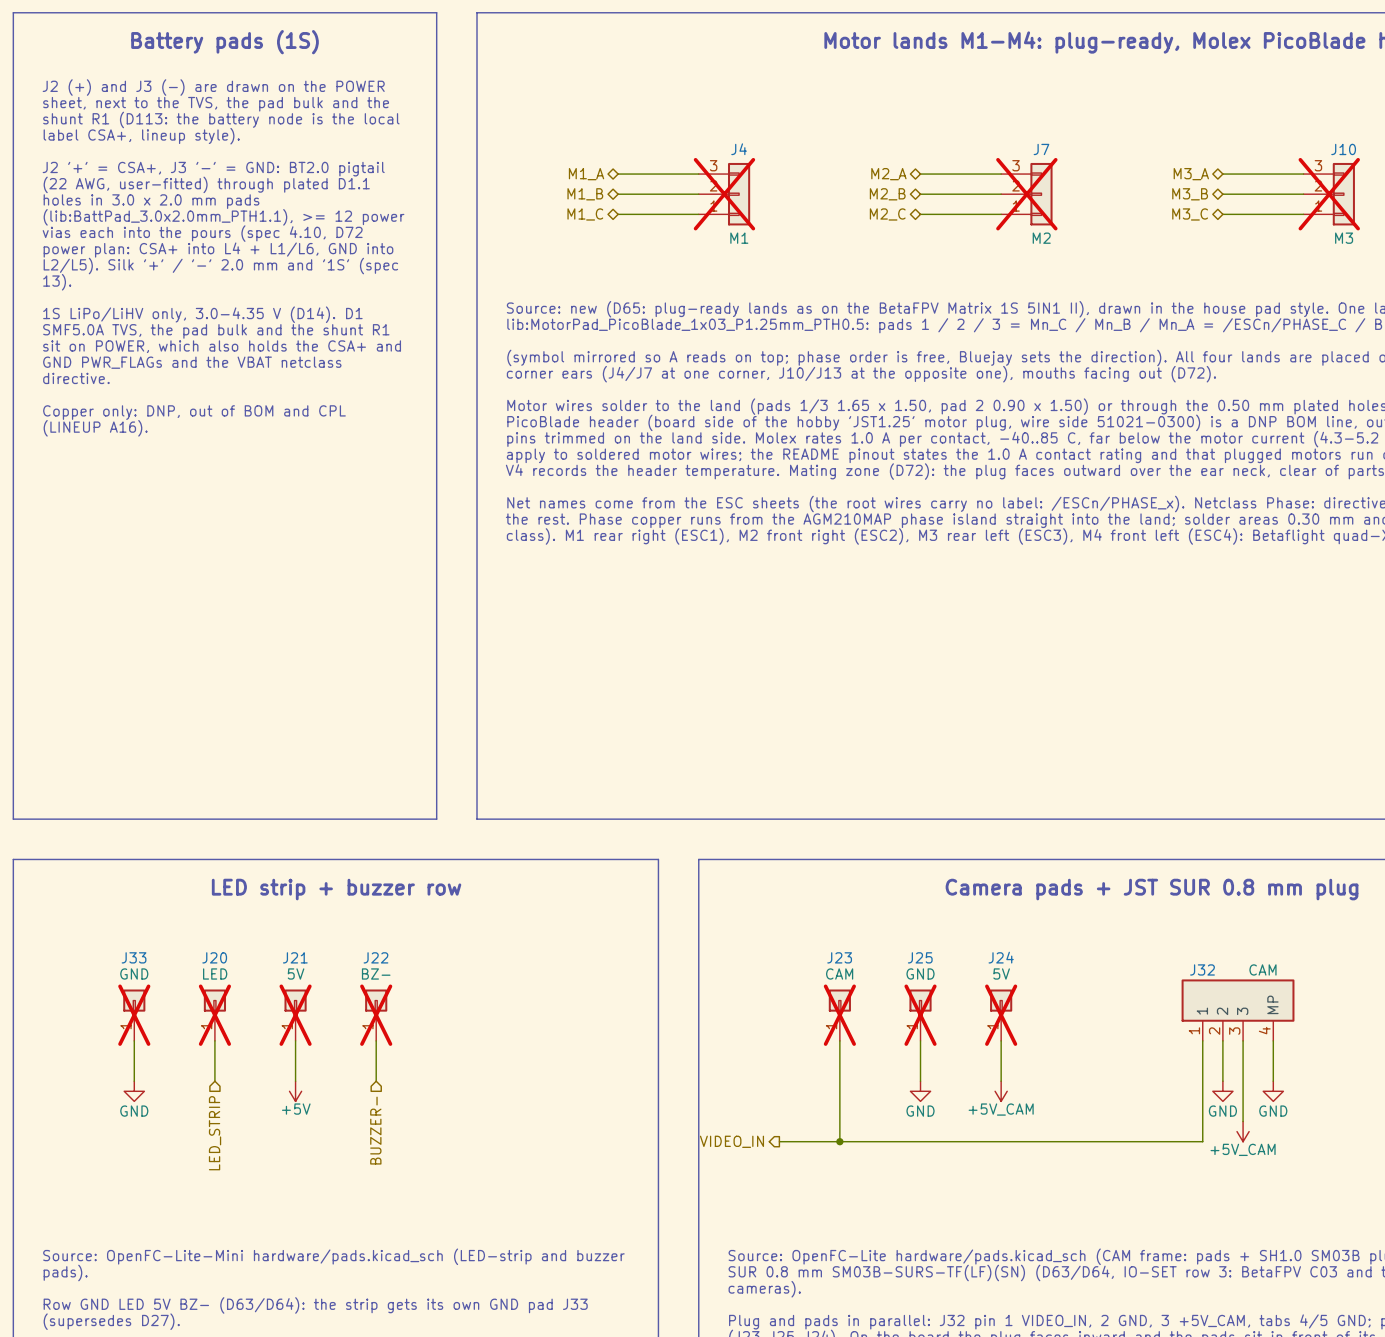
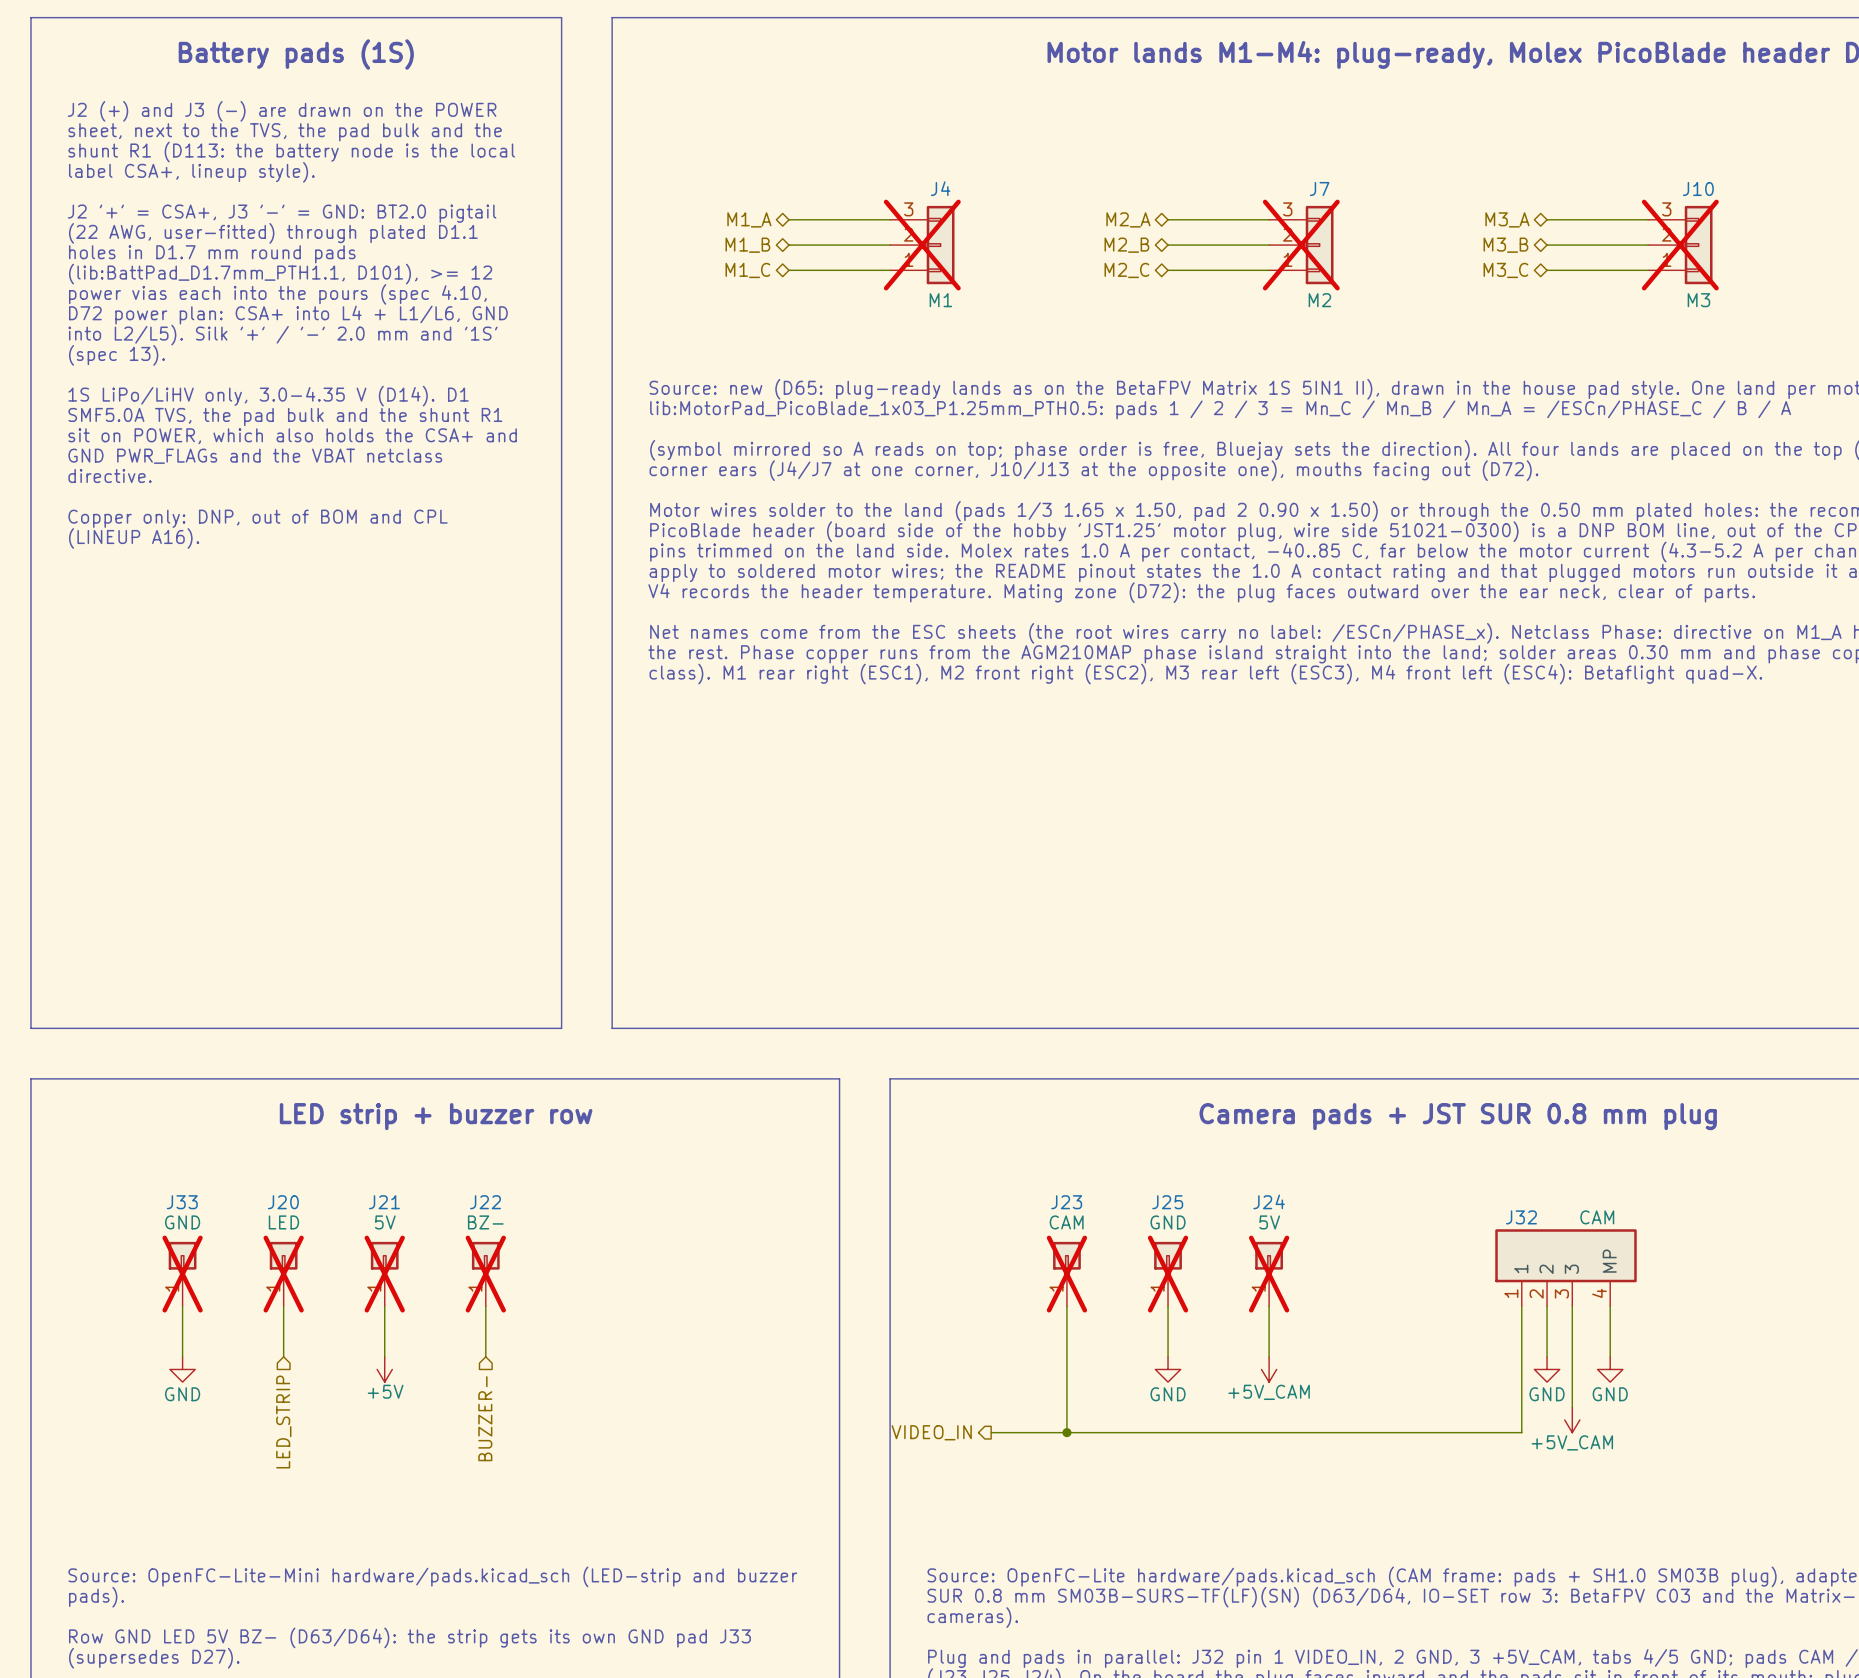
text: holes in 3.0 x 2.0 mm pads (151, 201) -> holes in D1.7 mm round pads (212, 254)
text: (lib:BattPad_3.0x2.0mm_PTH1.1), >= 12 power (224, 217) -> (lib:BattPad_D1.7mm_PTH1.1, D101), >= 12 (280, 274)
text: vias each into the pours (spec 4.10, D72 (202, 233) -> power vias each into the pours (spec 4.10, (277, 294)
text: power plan: CSA+ into L4 + L1/L6, GND into (218, 250) -> D72 power plan: CSA+ into L4 + L1/L6, GND (288, 315)
text: L2/L5). Silk '+' / '-' 2.0 mm and '1S' (spec (220, 266) -> into L2/L5). Silk '+' / '-' 2.0 mm and '1S' (283, 335)
text: 13). (57, 282) -> (spec 13). (116, 355)

